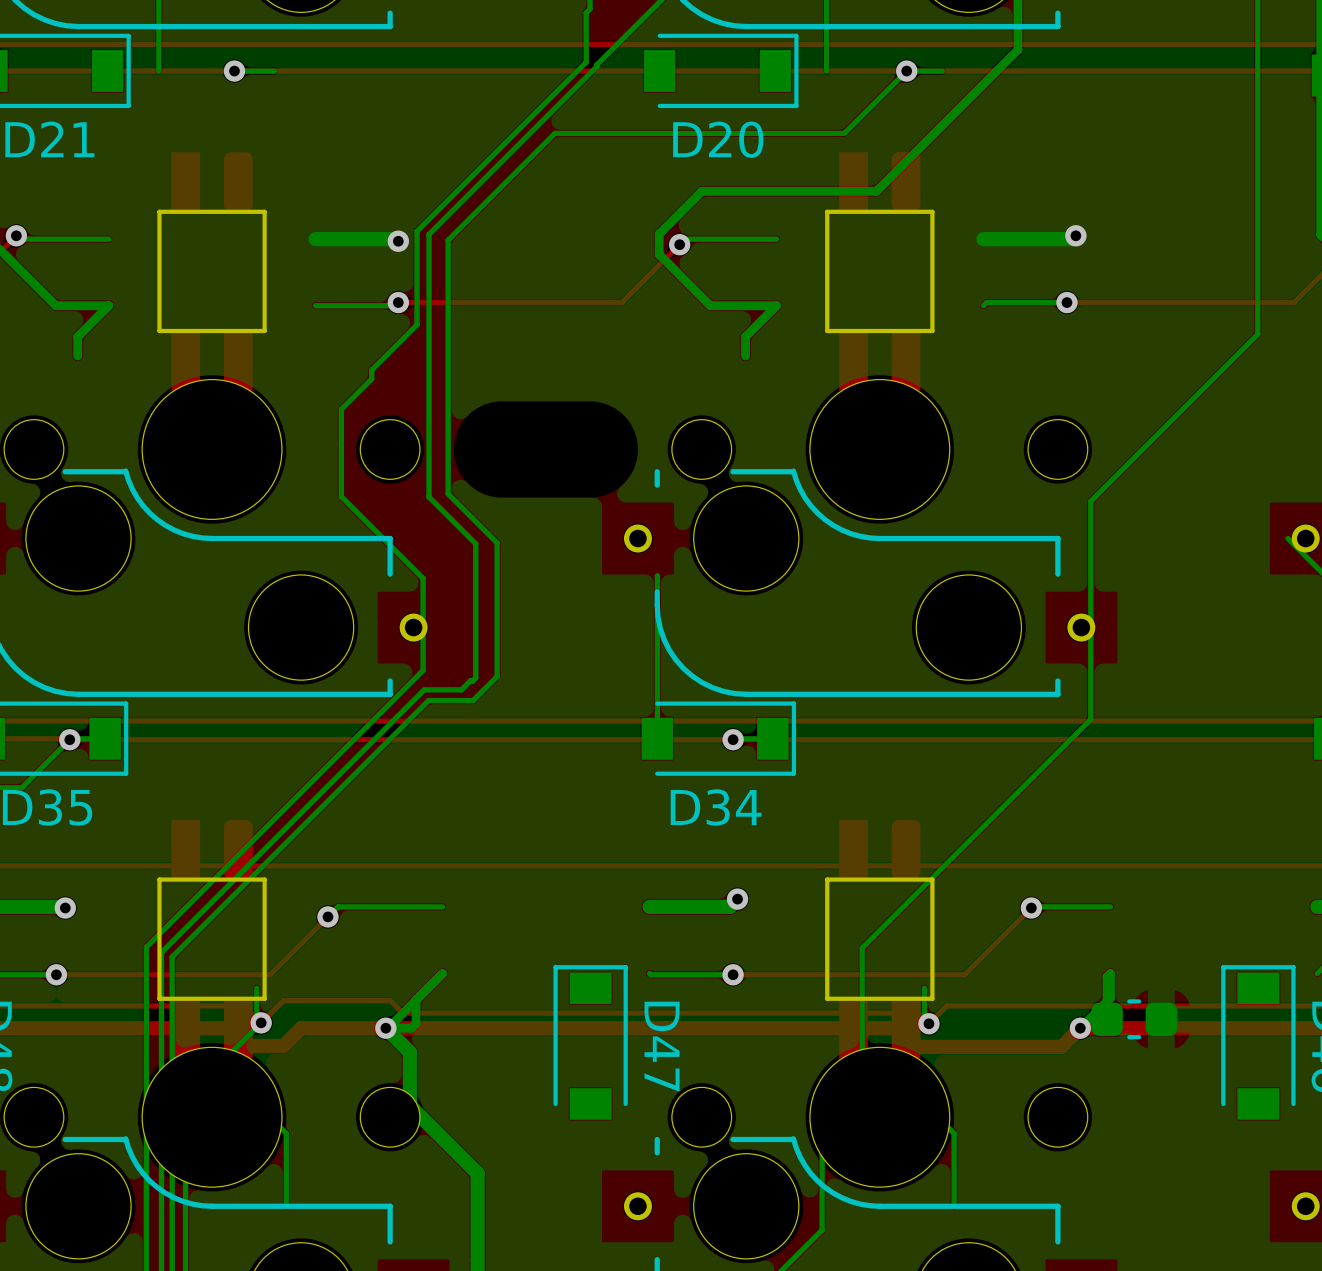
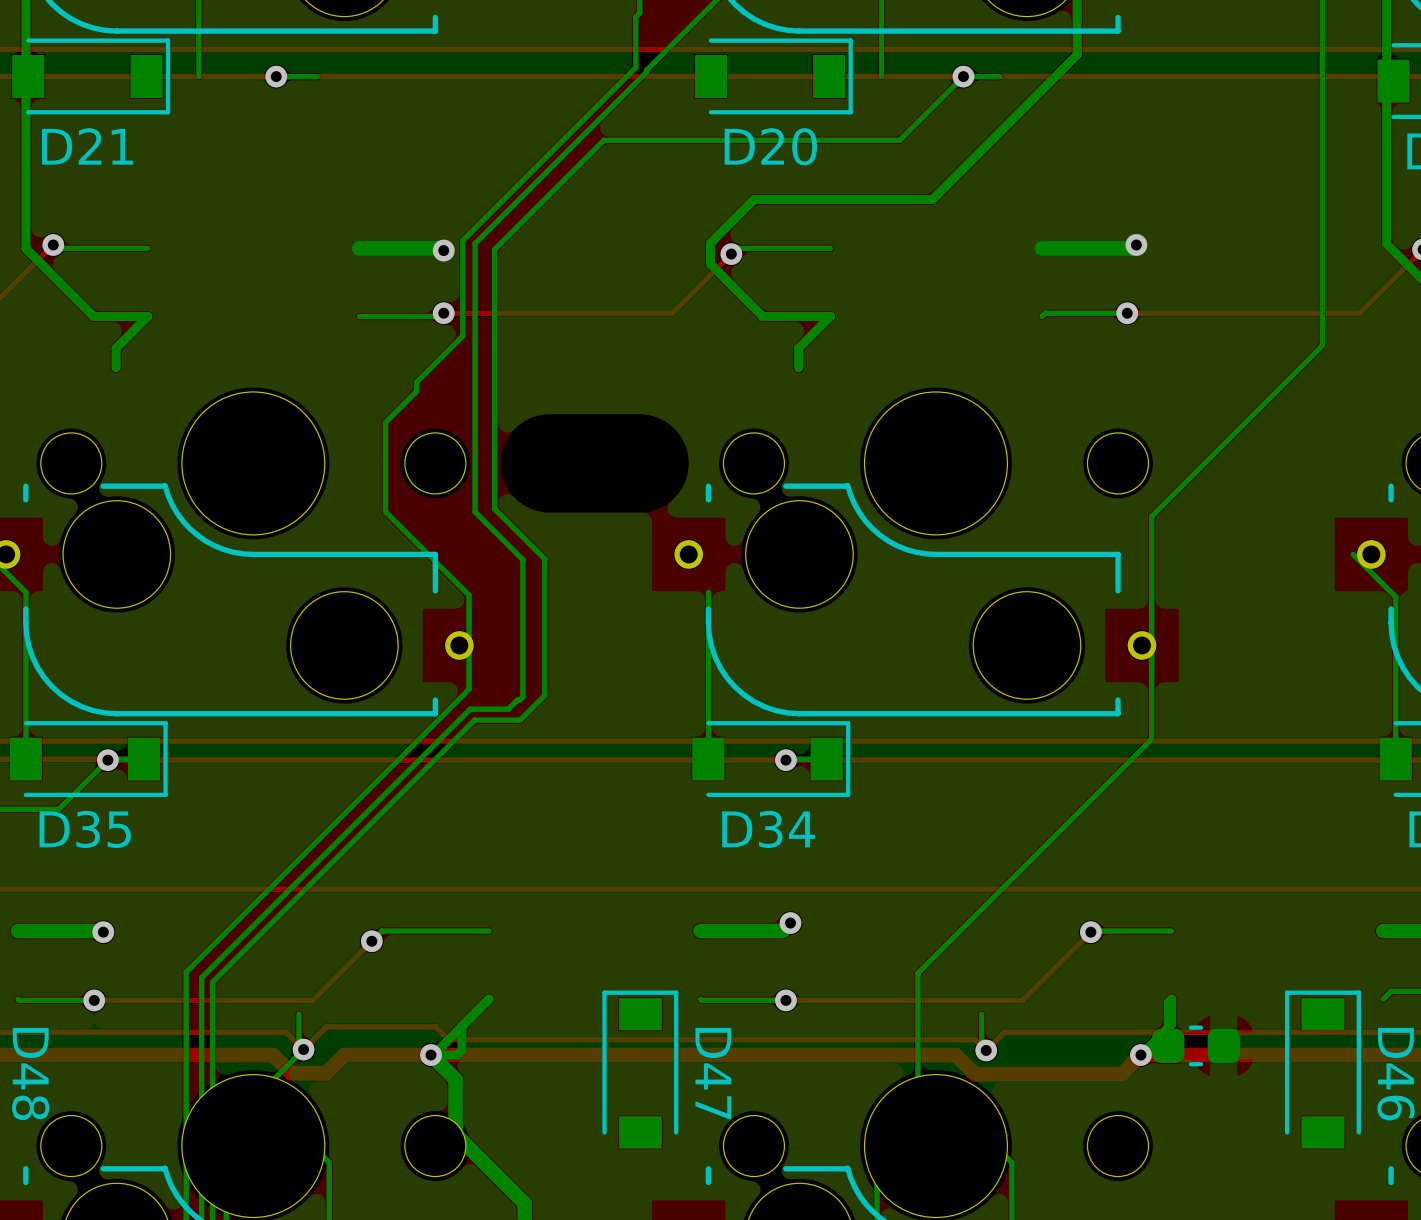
part: (212, 271) -> none
part: (879, 271) -> none
part: (212, 939) -> none
part: (879, 939) -> none

